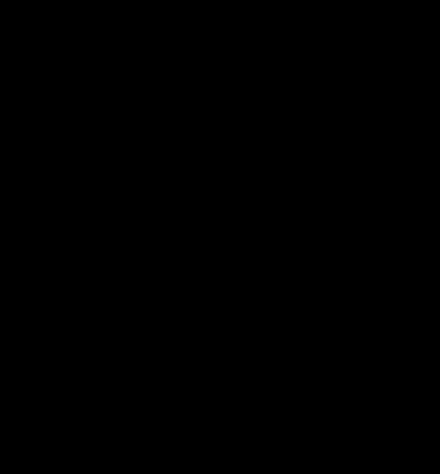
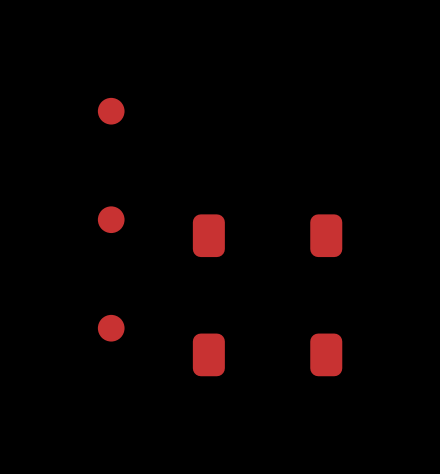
part: none -> (111, 111)
part: none -> (111, 219)
part: none -> (267, 235)
part: none -> (111, 328)
part: none -> (267, 354)

